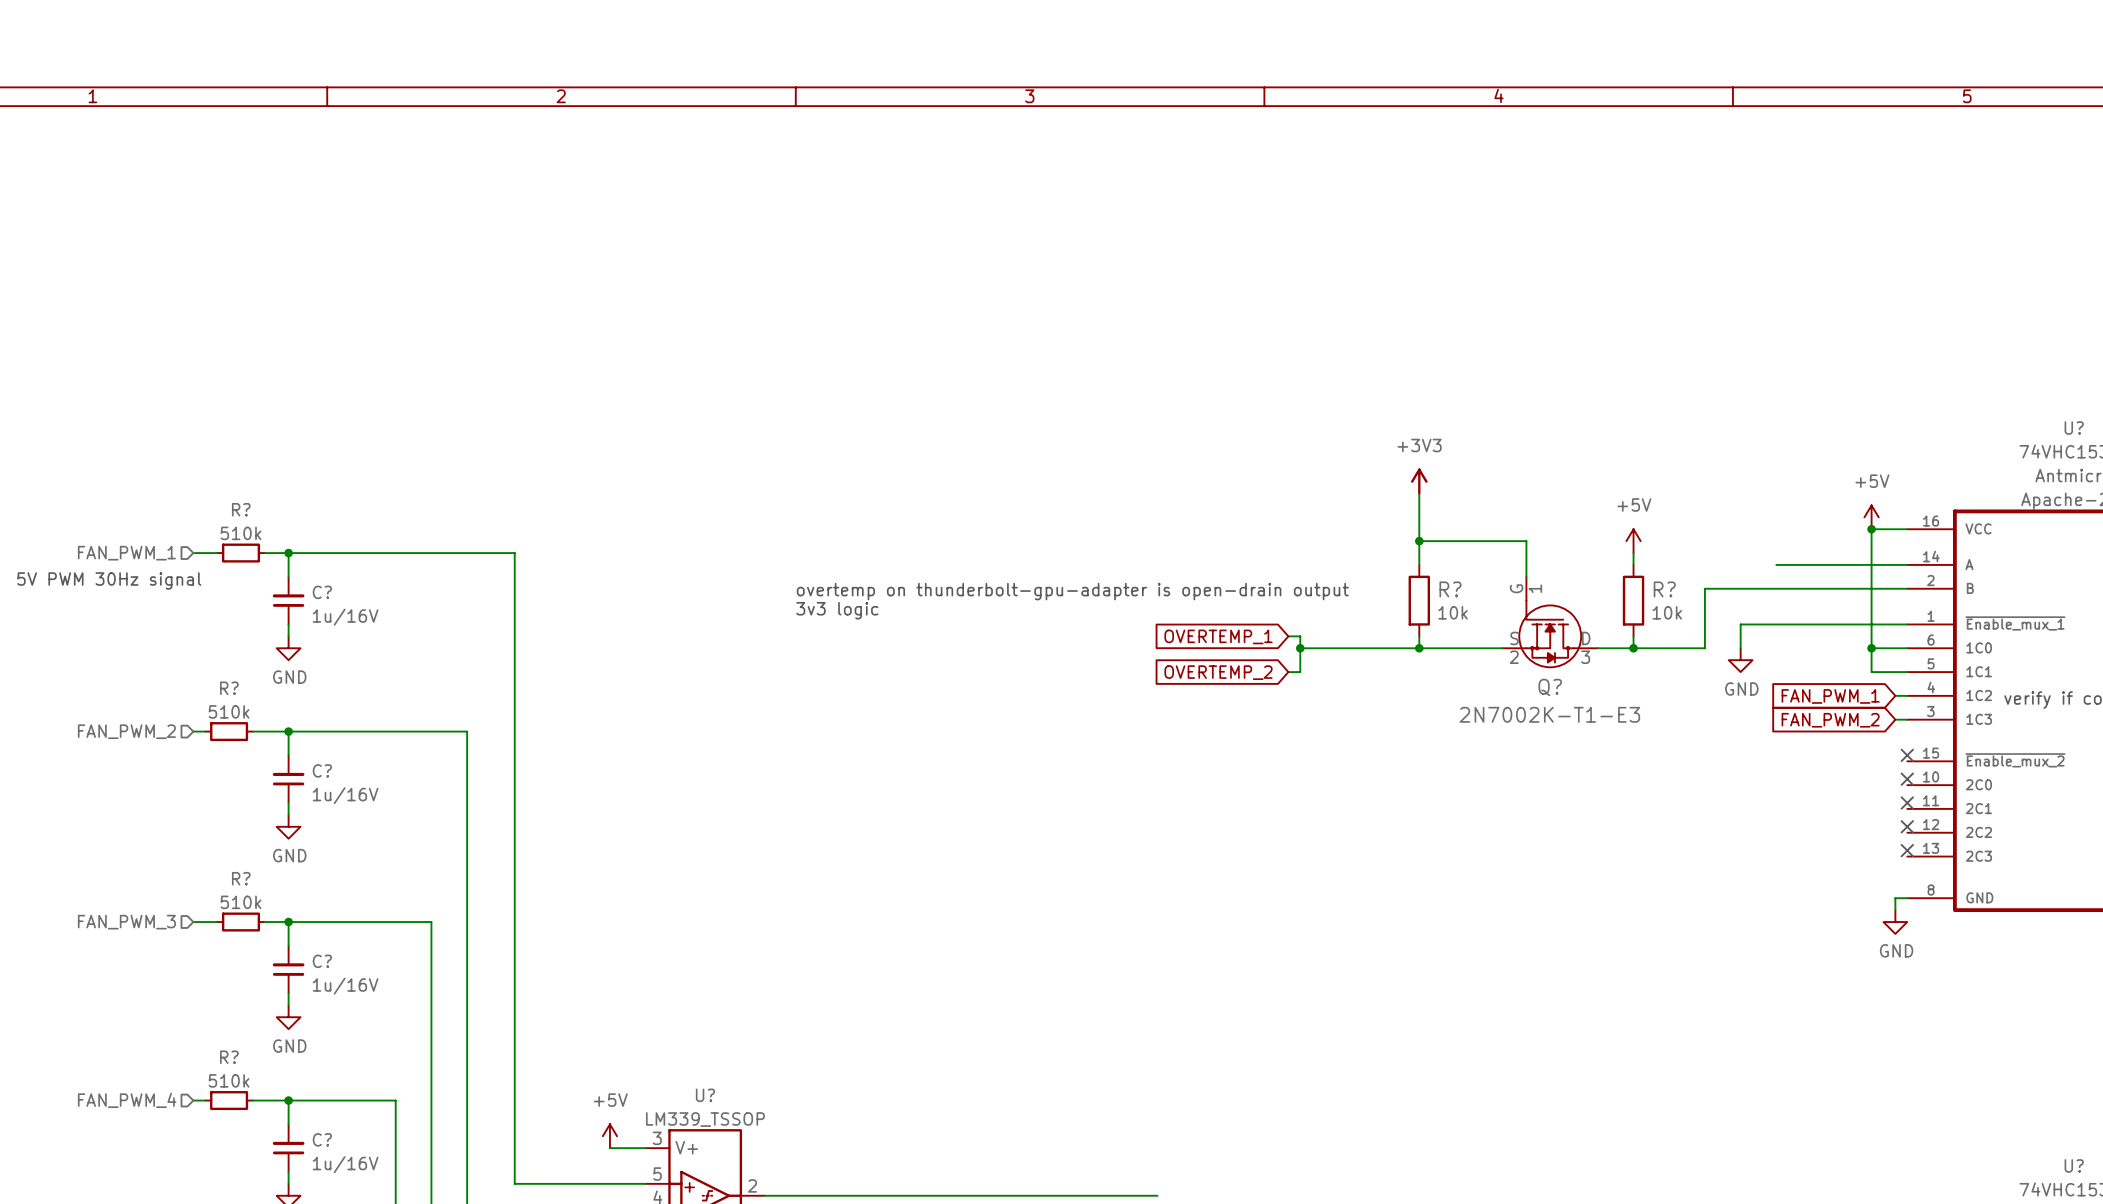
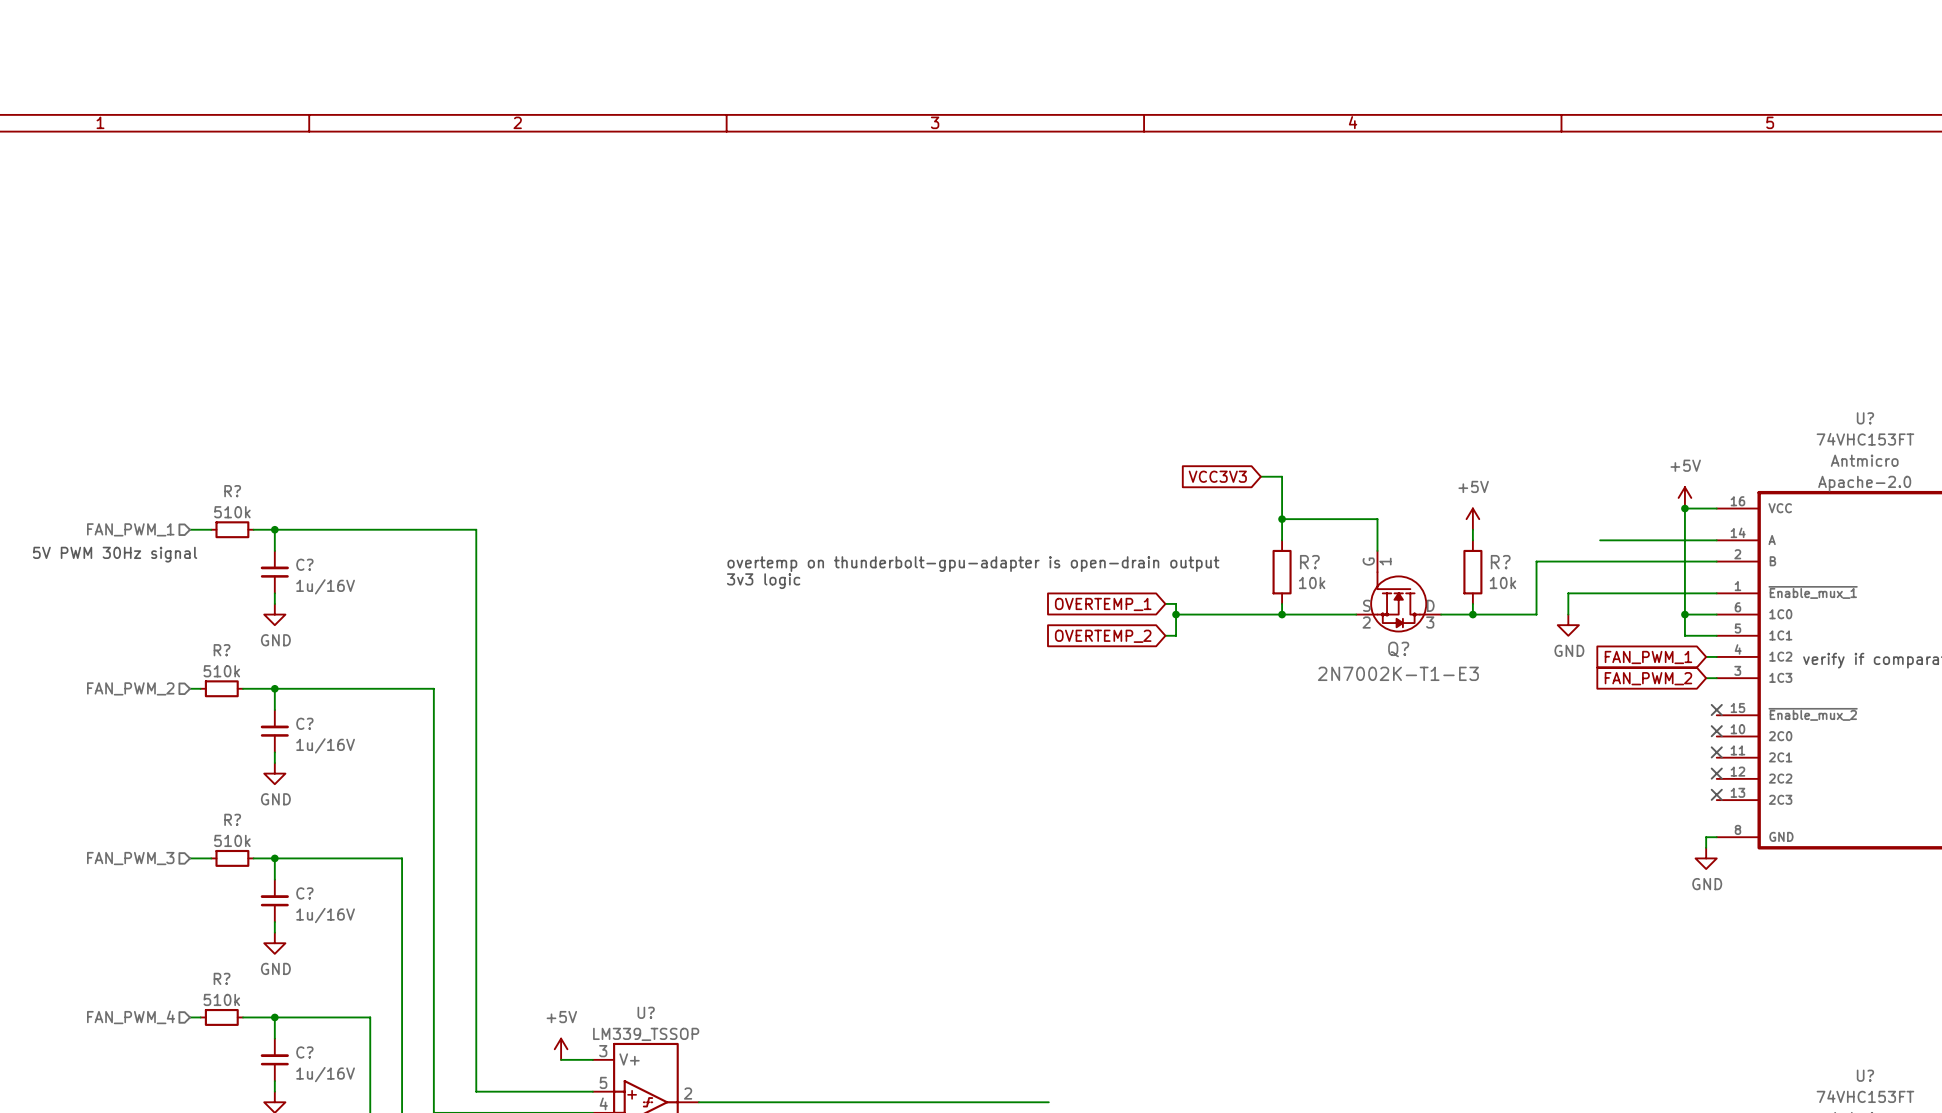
power symbol: +3V3 (1419, 481) -> none
global label: none -> VCC3V3 (1217, 476)
wire: none -> (1260, 476) (1282, 476)

